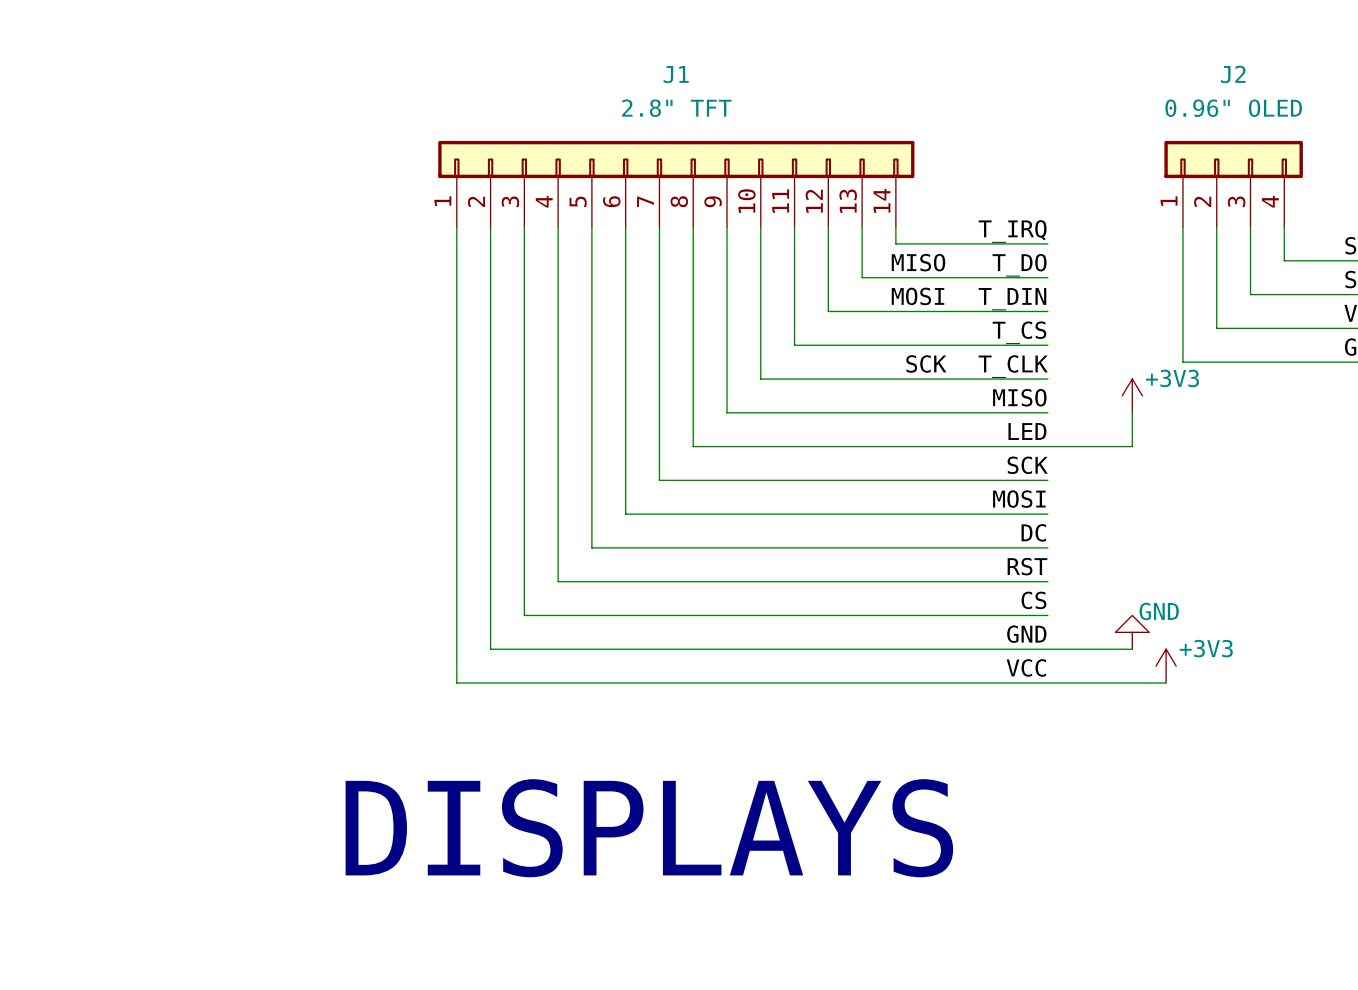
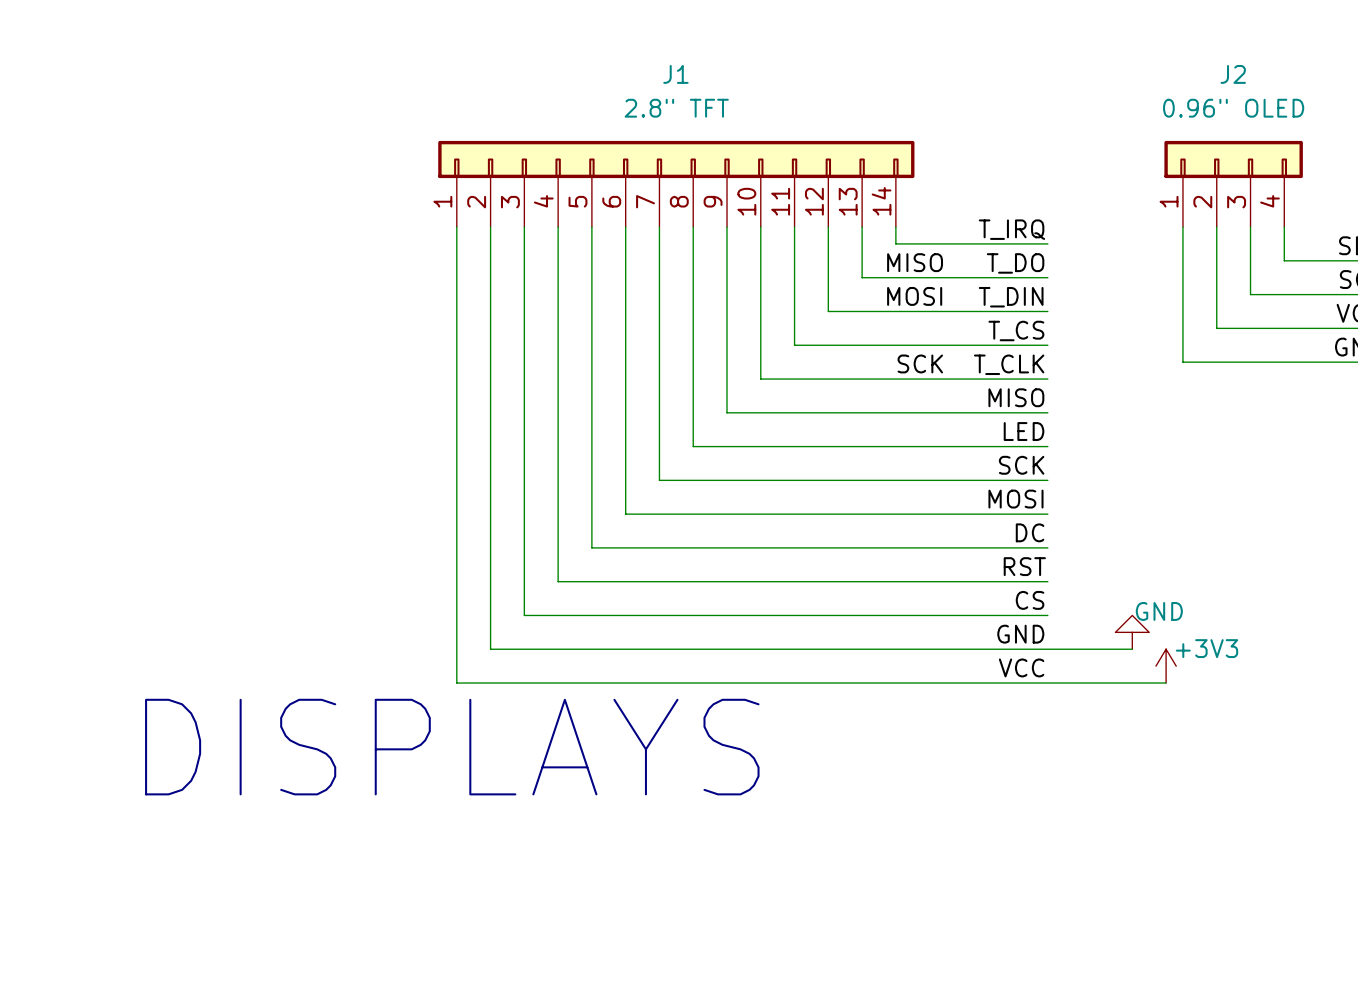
power symbol: +3V3 (1132, 395) -> none
wire: (1132, 412) (1132, 446) (1047, 446) -> none
text position: DISPLAYS (649, 828) -> DISPLAYS (452, 747)

